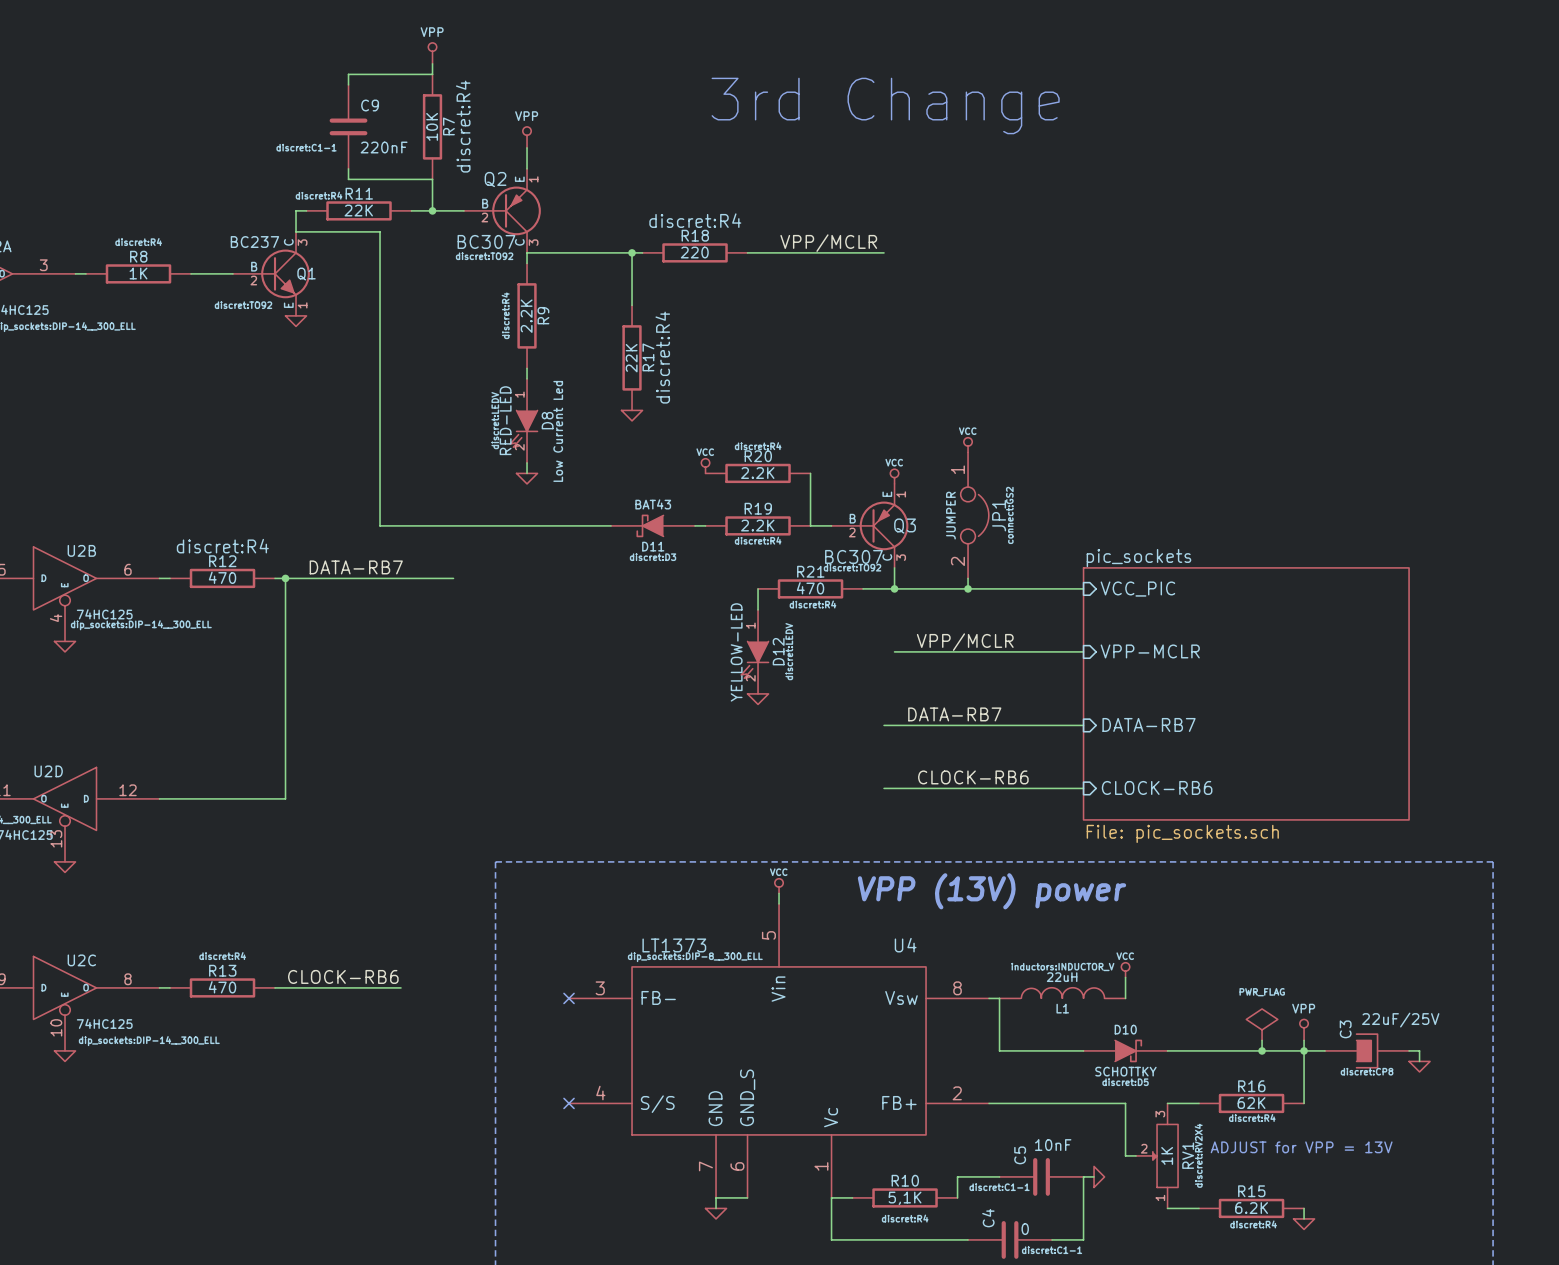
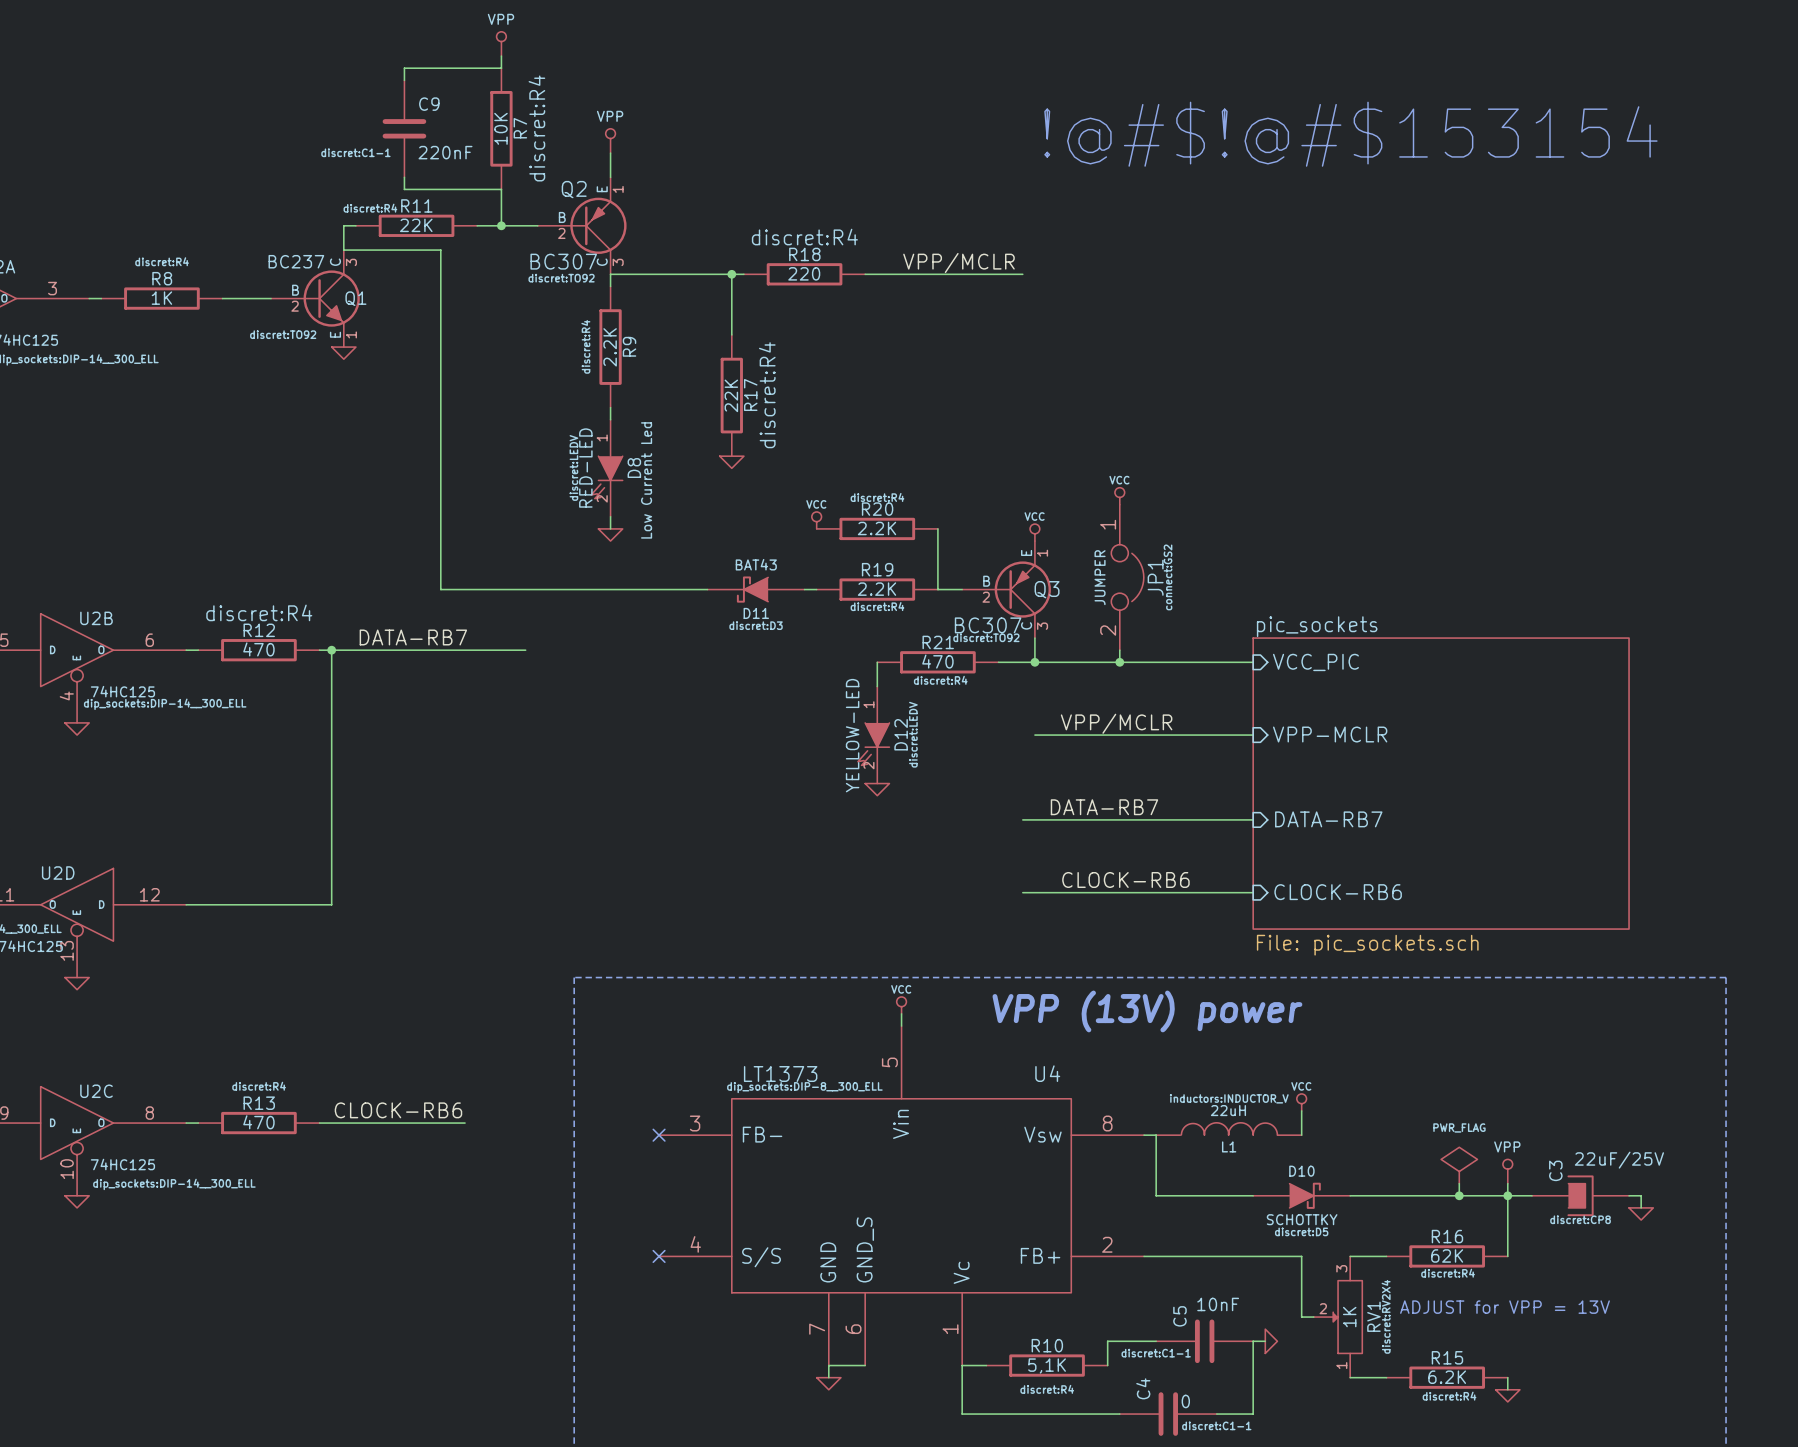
text: 3rd Change (885, 105) -> none
text: none -> !@#$!@#$153154 (1350, 134)

